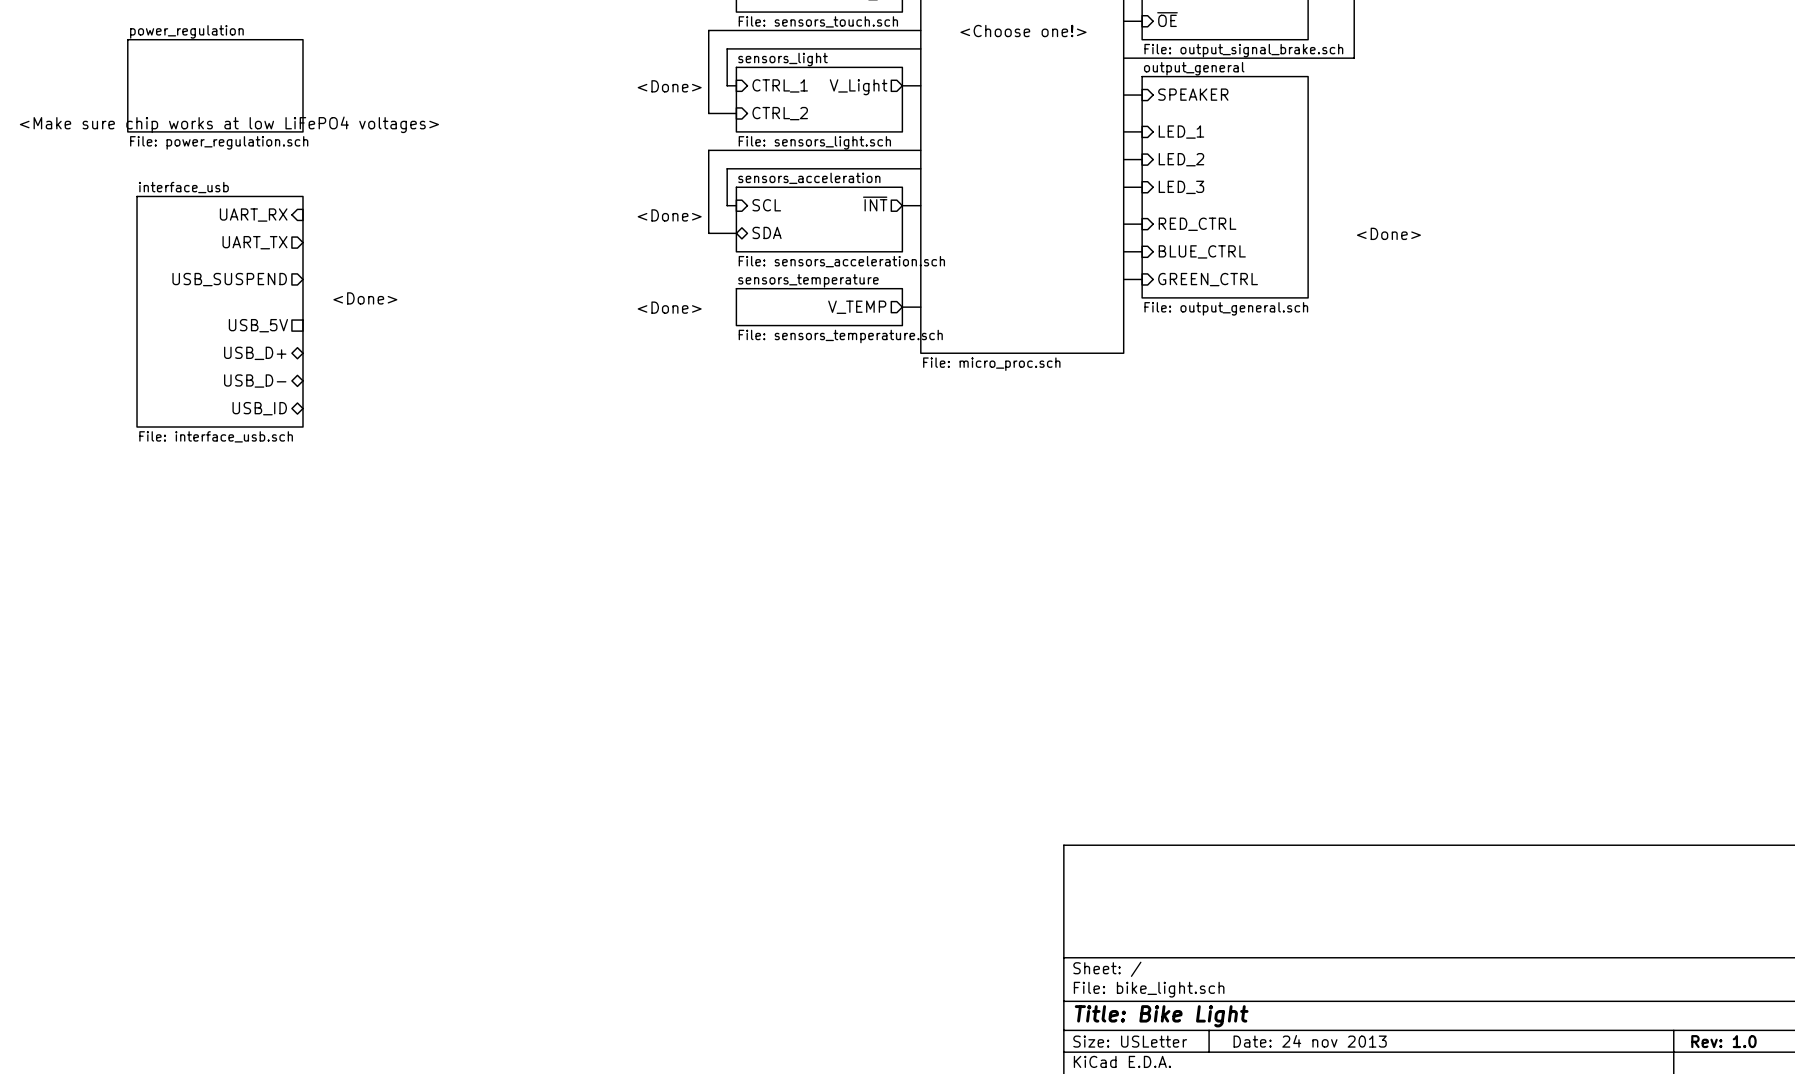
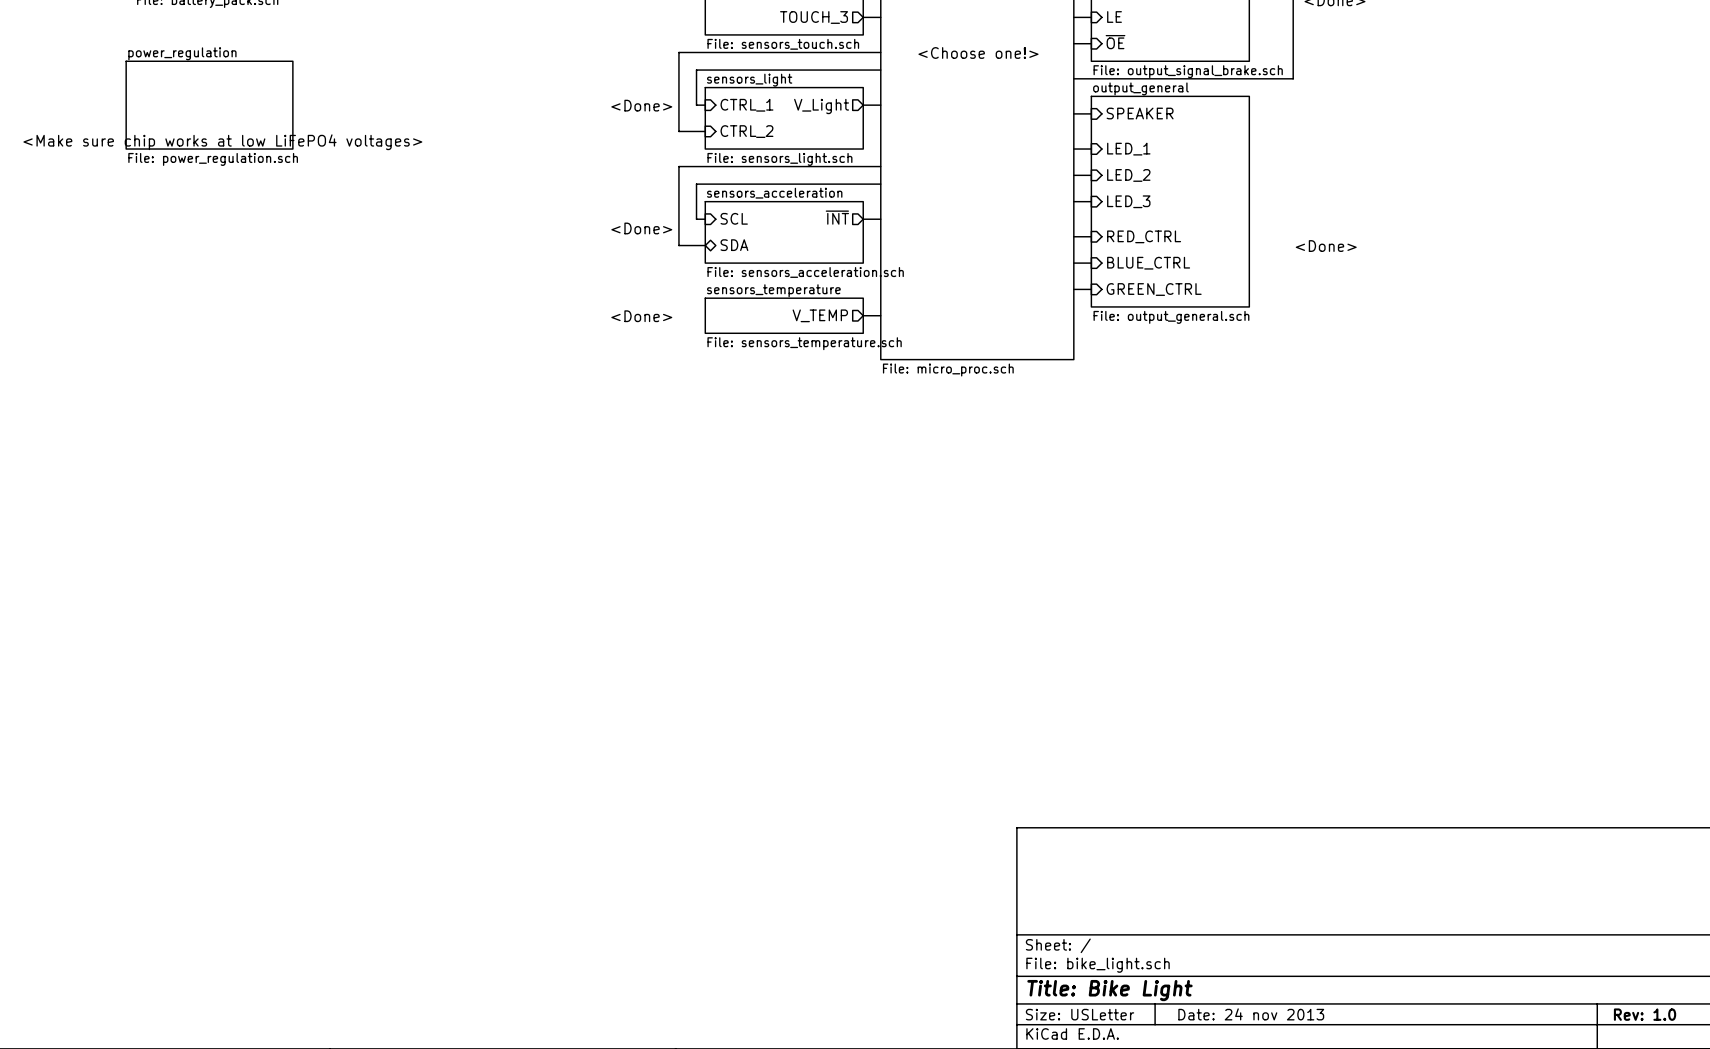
sheet pin: UART_RX (253, 215) -> none
sheet pin: UART_TX (254, 242) -> none
sheet pin: USB_SUSPEND (229, 279) -> none
text: <Done> (365, 298) -> none
sheet interface_usb: File: interface_usb.sch (220, 311) -> none
sheet pin: USB_5V (258, 325) -> none
sheet pin: USB_D+ (255, 353) -> none
sheet pin: USB_D- (255, 381) -> none
sheet pin: USB_ID (259, 408) -> none

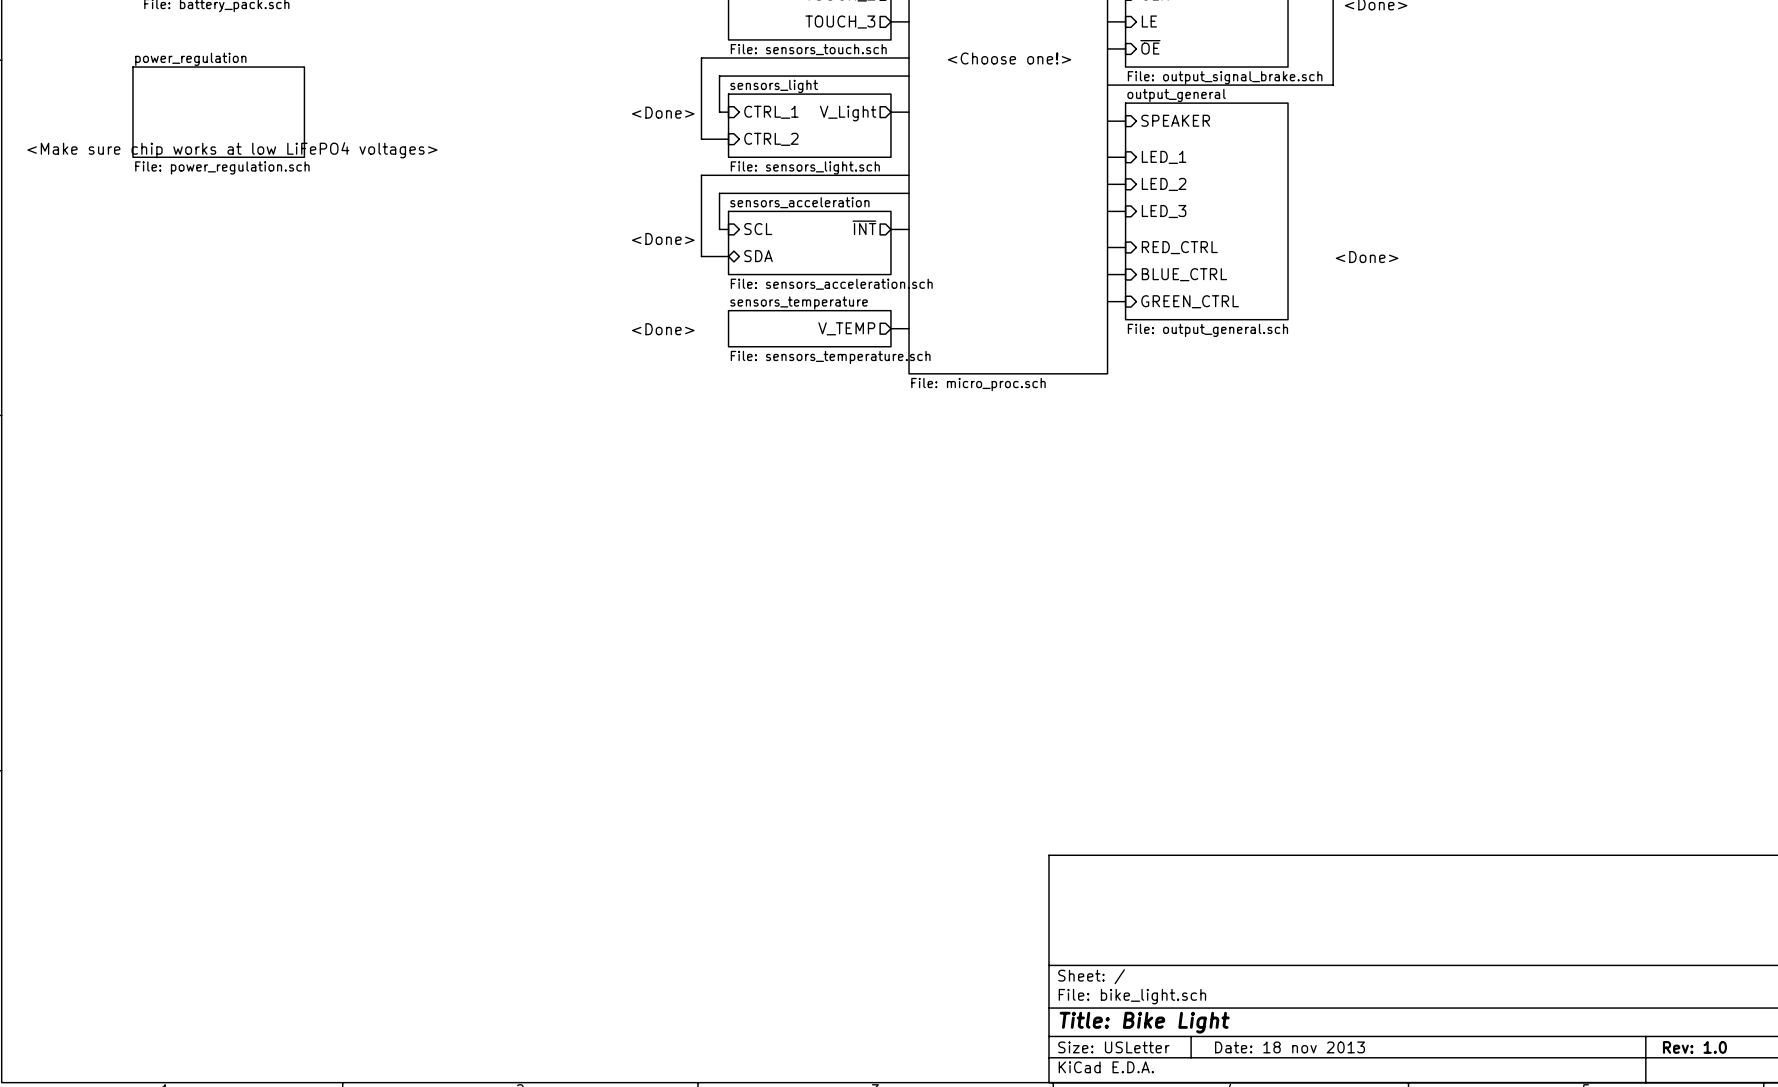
title block: Date: 24 nov 2013 (1251, 1014) -> Date: 18 nov 2013 (1290, 1047)

